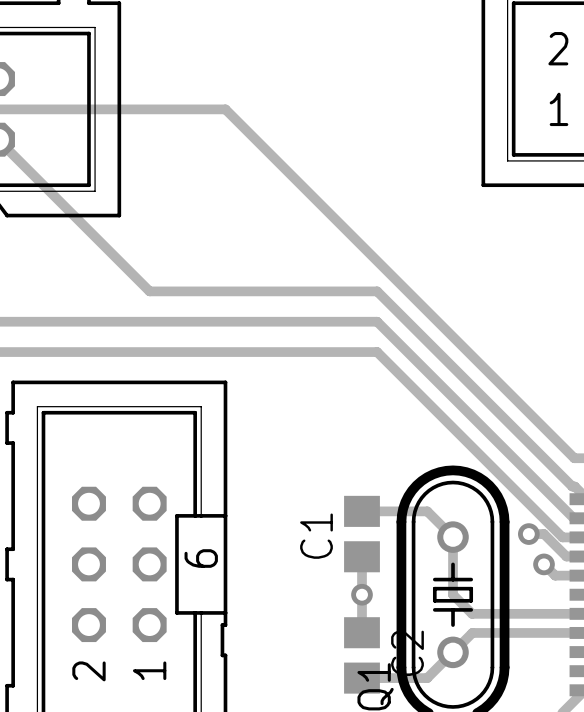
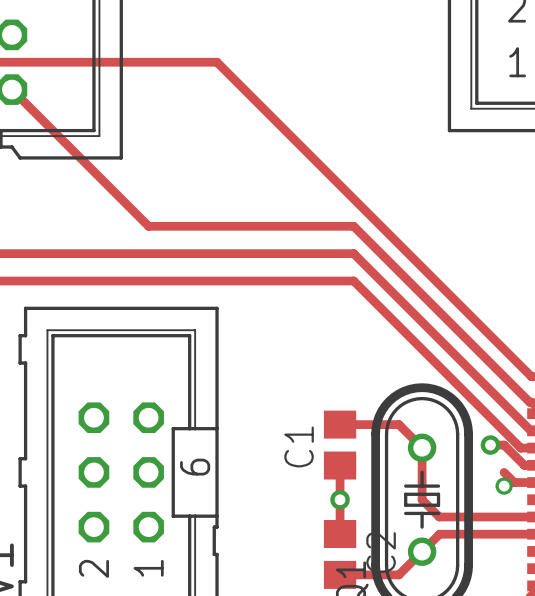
via position: (544, 564) -> (504, 486)

